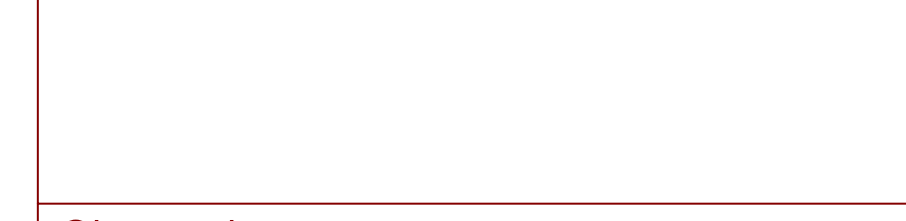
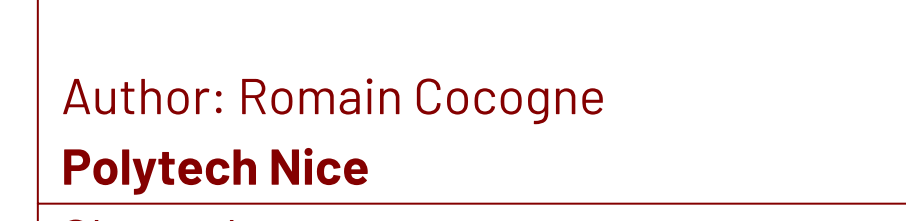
title block: none -> Author: Romain Cocogne (332, 101)
title block: none -> Polytech Nice (215, 171)

